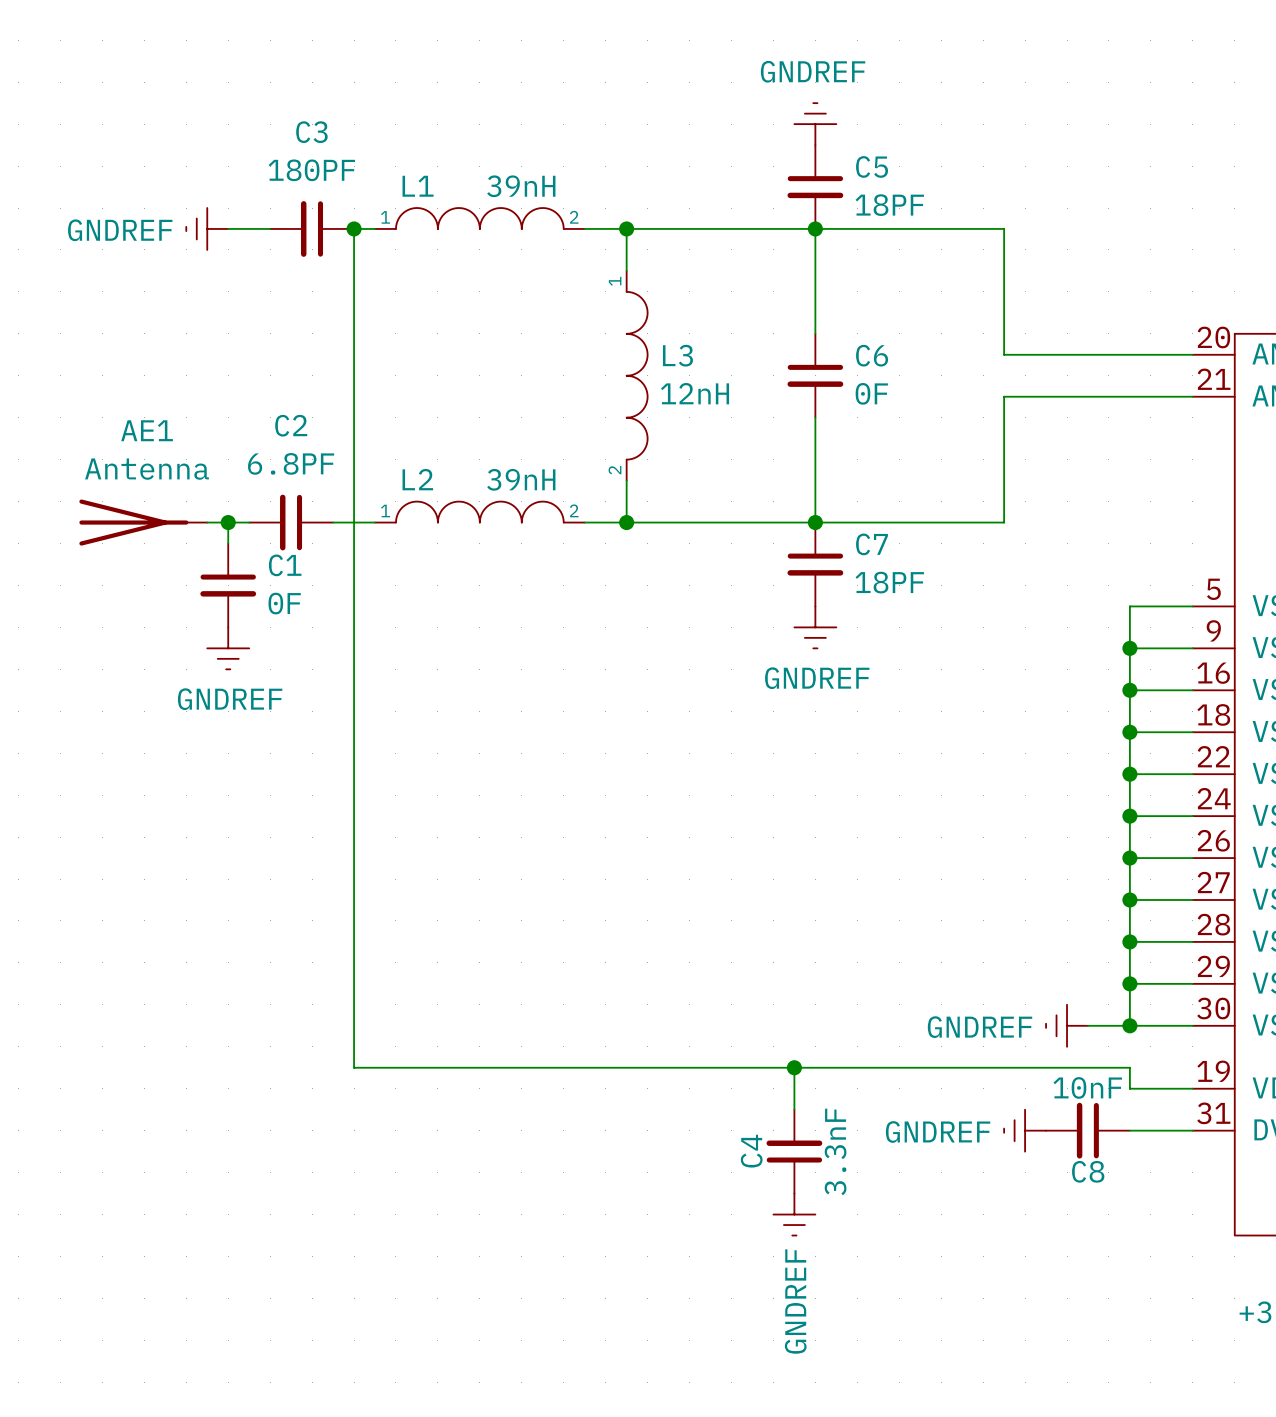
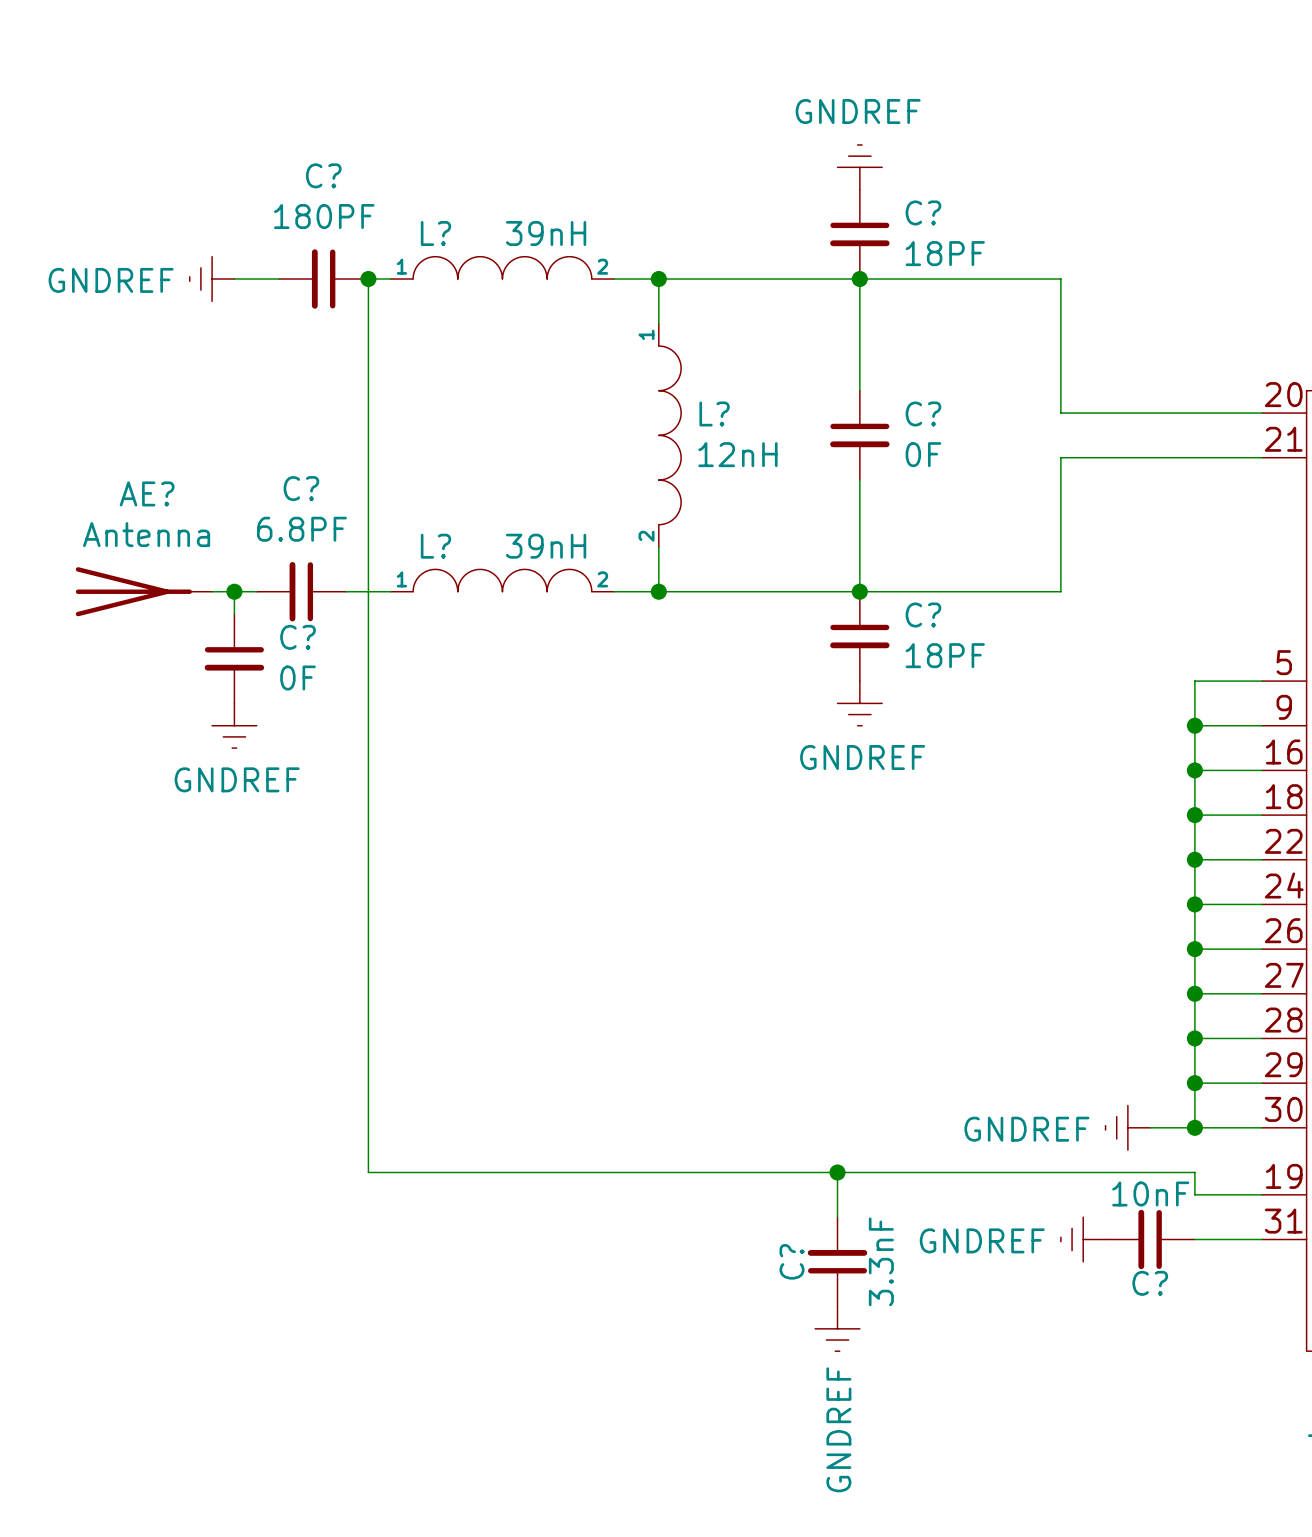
C3 name: C3 (311, 132) -> C? (323, 175)
C5 name: C5 (872, 166) -> C? (923, 212)
L1 name: L1 (418, 186) -> L? (435, 233)
L3 name: L3 (677, 355) -> L? (714, 413)
C6 name: C6 (872, 355) -> C? (923, 413)
C2 name: C2 (291, 425) -> C? (301, 488)
AE1 name: AE1 (147, 430) -> AE? (147, 493)
L2 name: L2 (417, 479) -> L? (435, 546)
C7 name: C7 (872, 544) -> C? (923, 615)
C1 name: C1 (285, 565) -> C? (298, 637)
C4 name: C4 (751, 1151) -> C? (792, 1261)
C8 name: C8 (1088, 1171) -> C? (1150, 1283)

